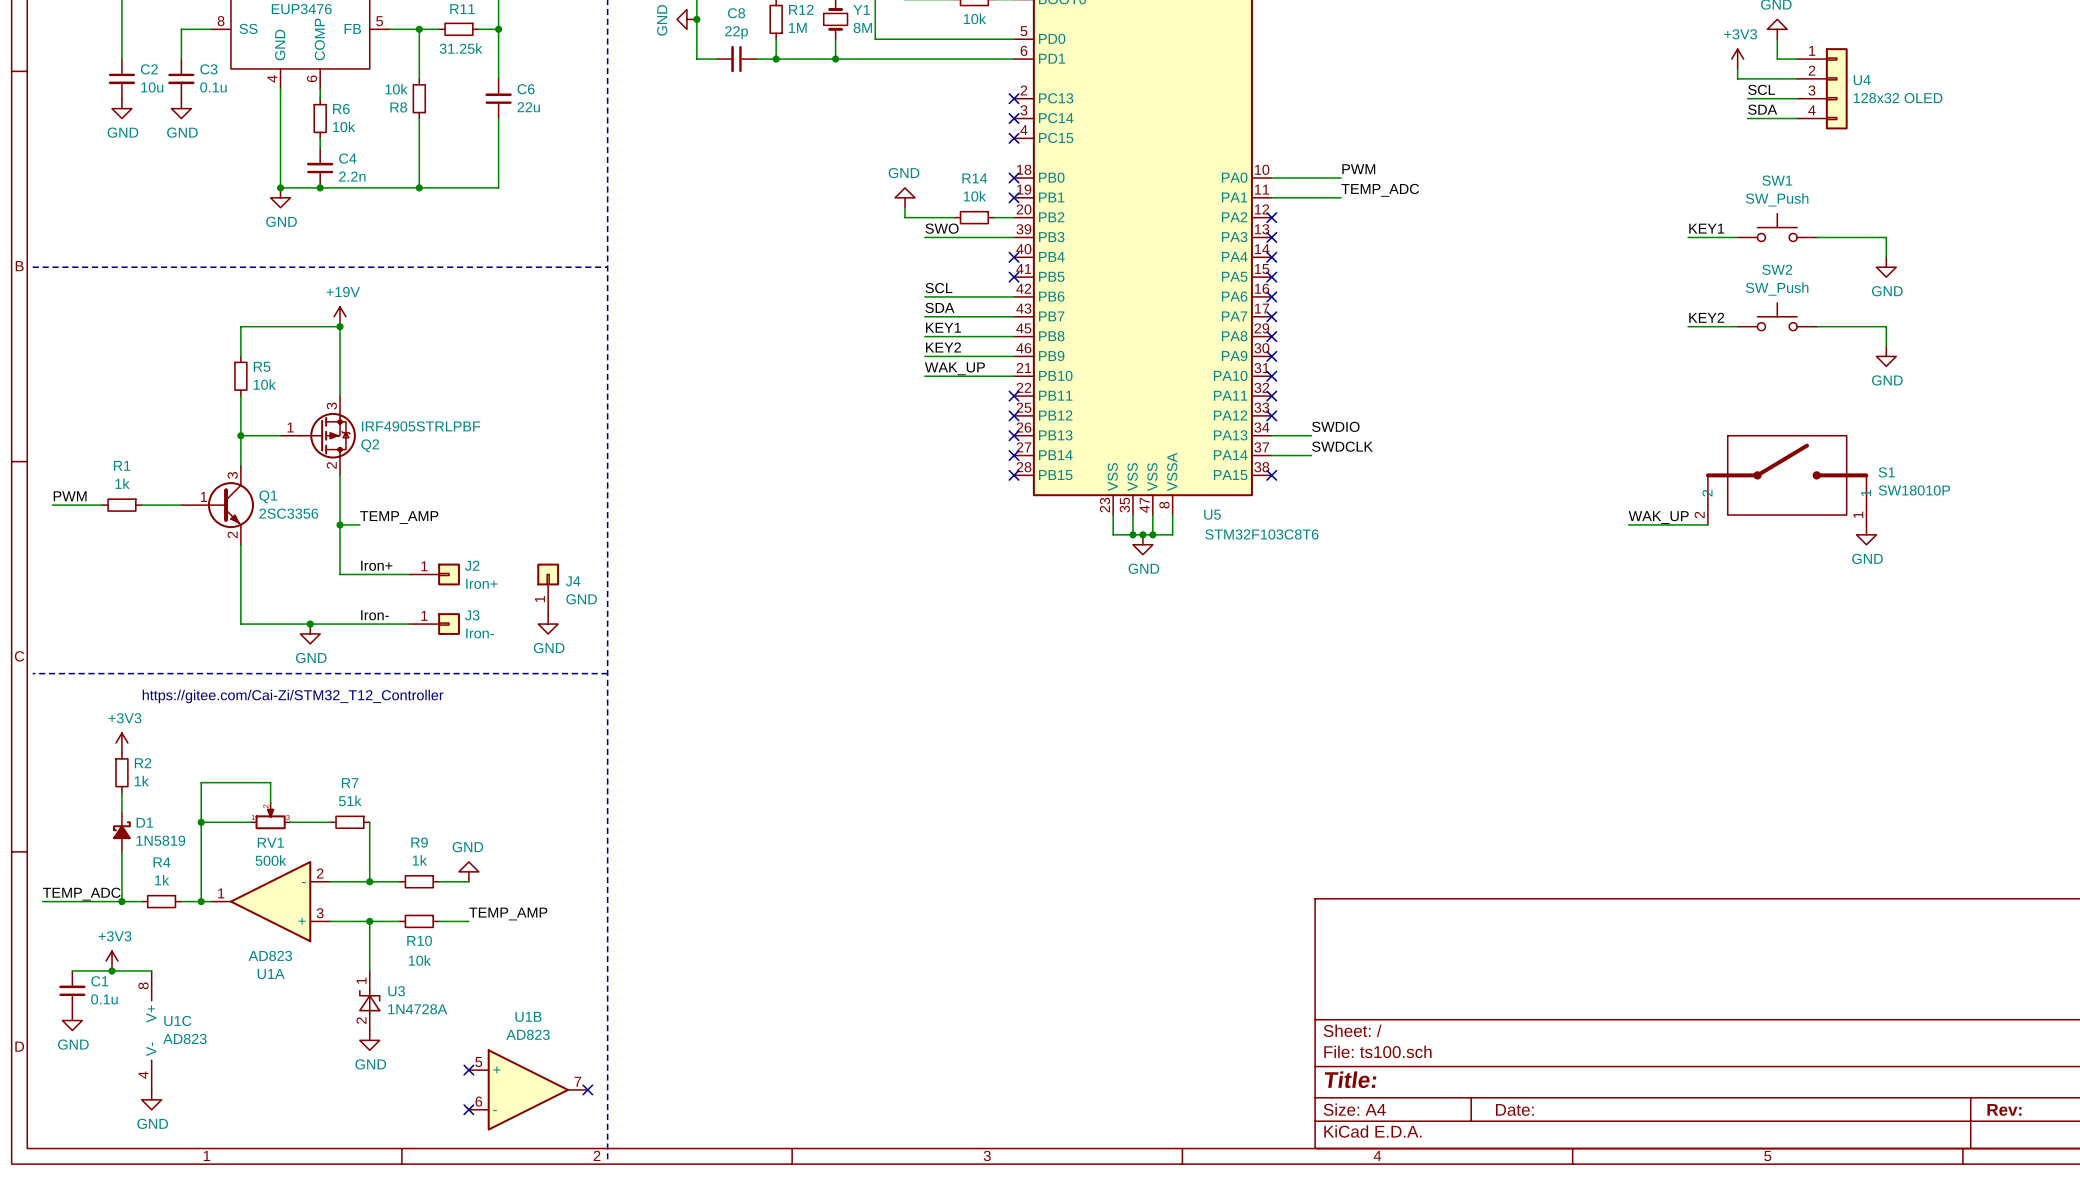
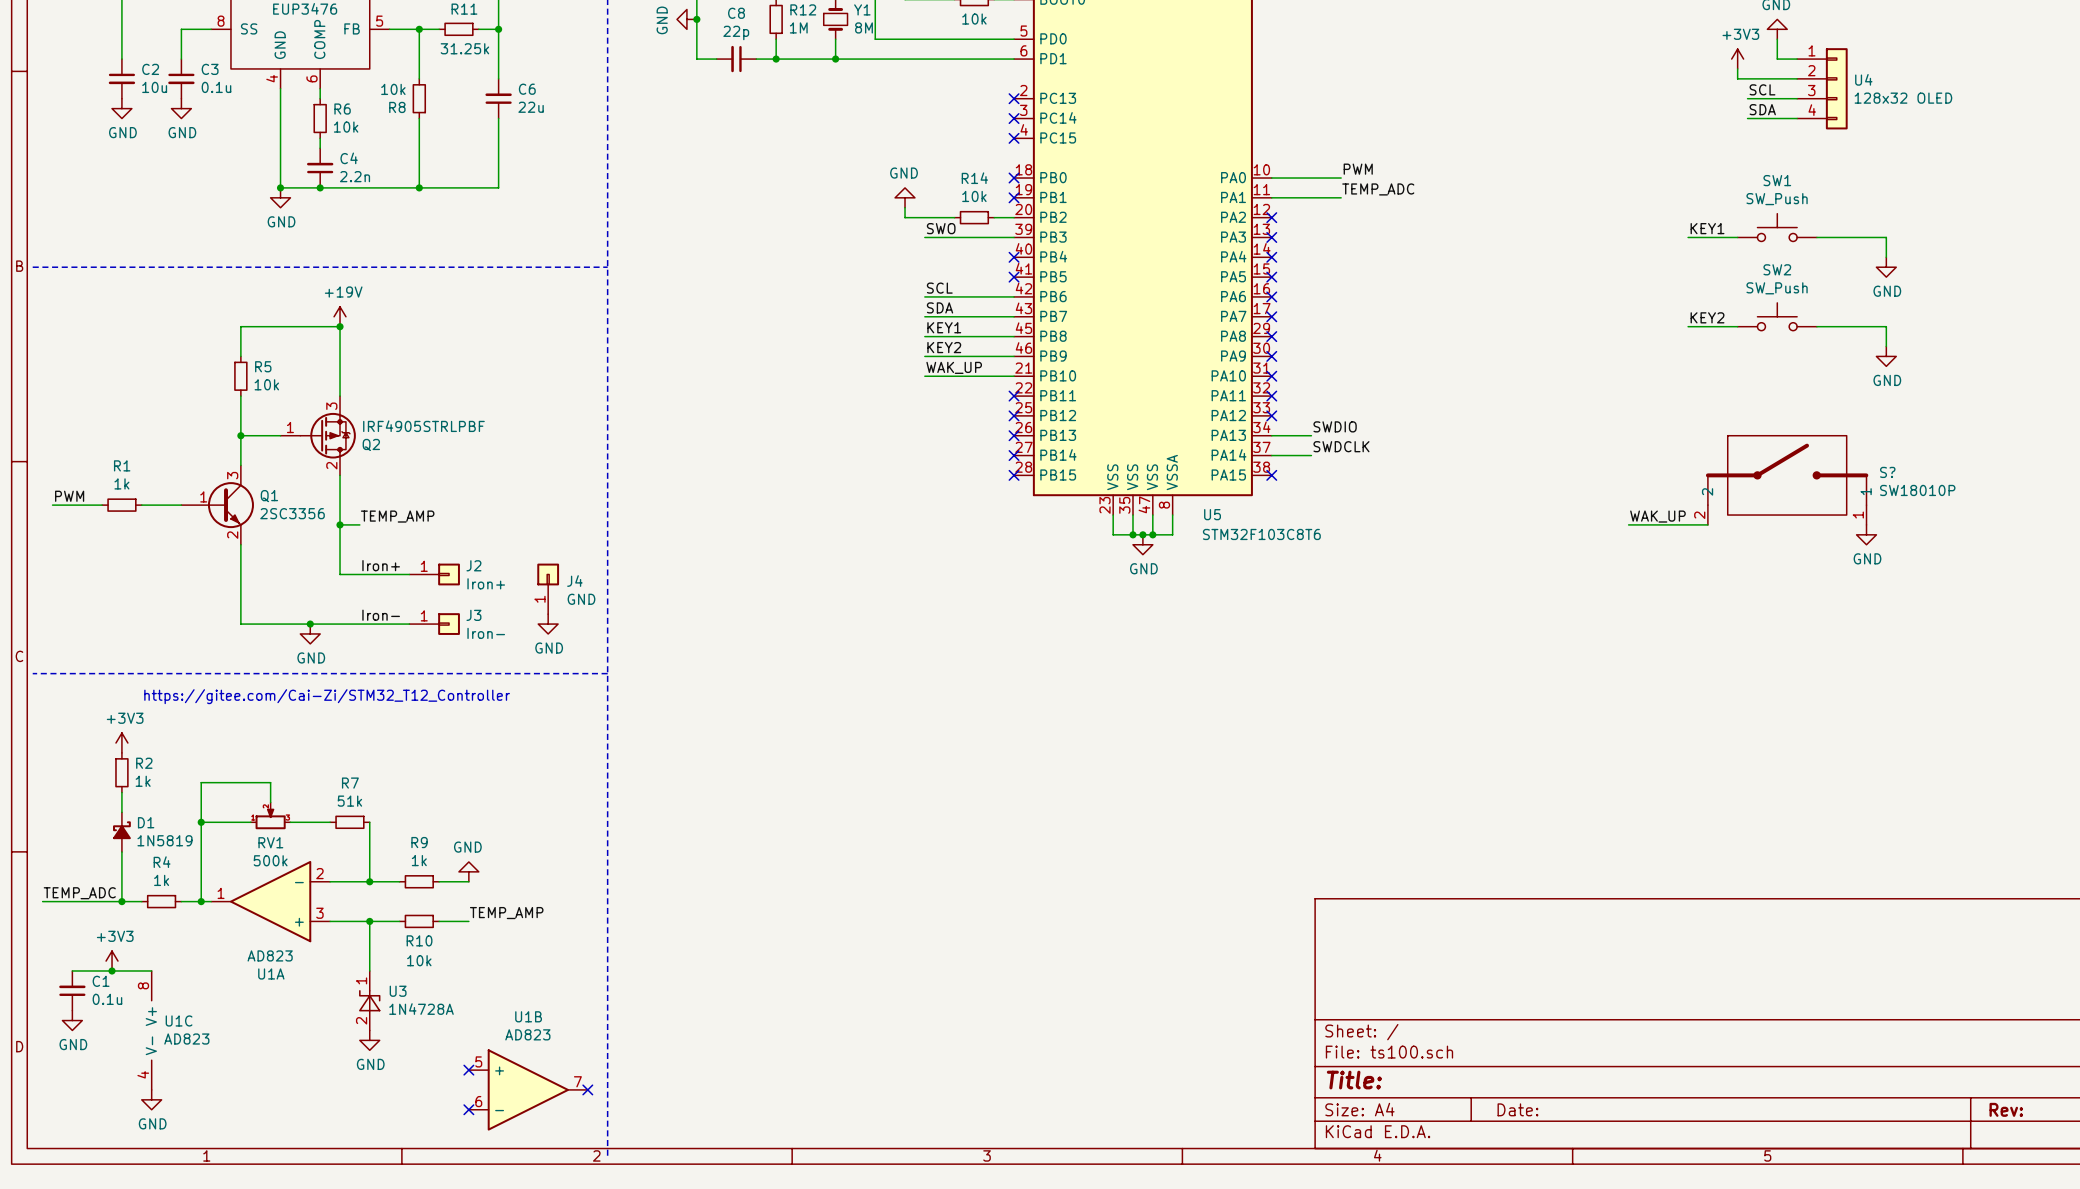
S1 name: S1 (1886, 472) -> S? (1887, 472)

